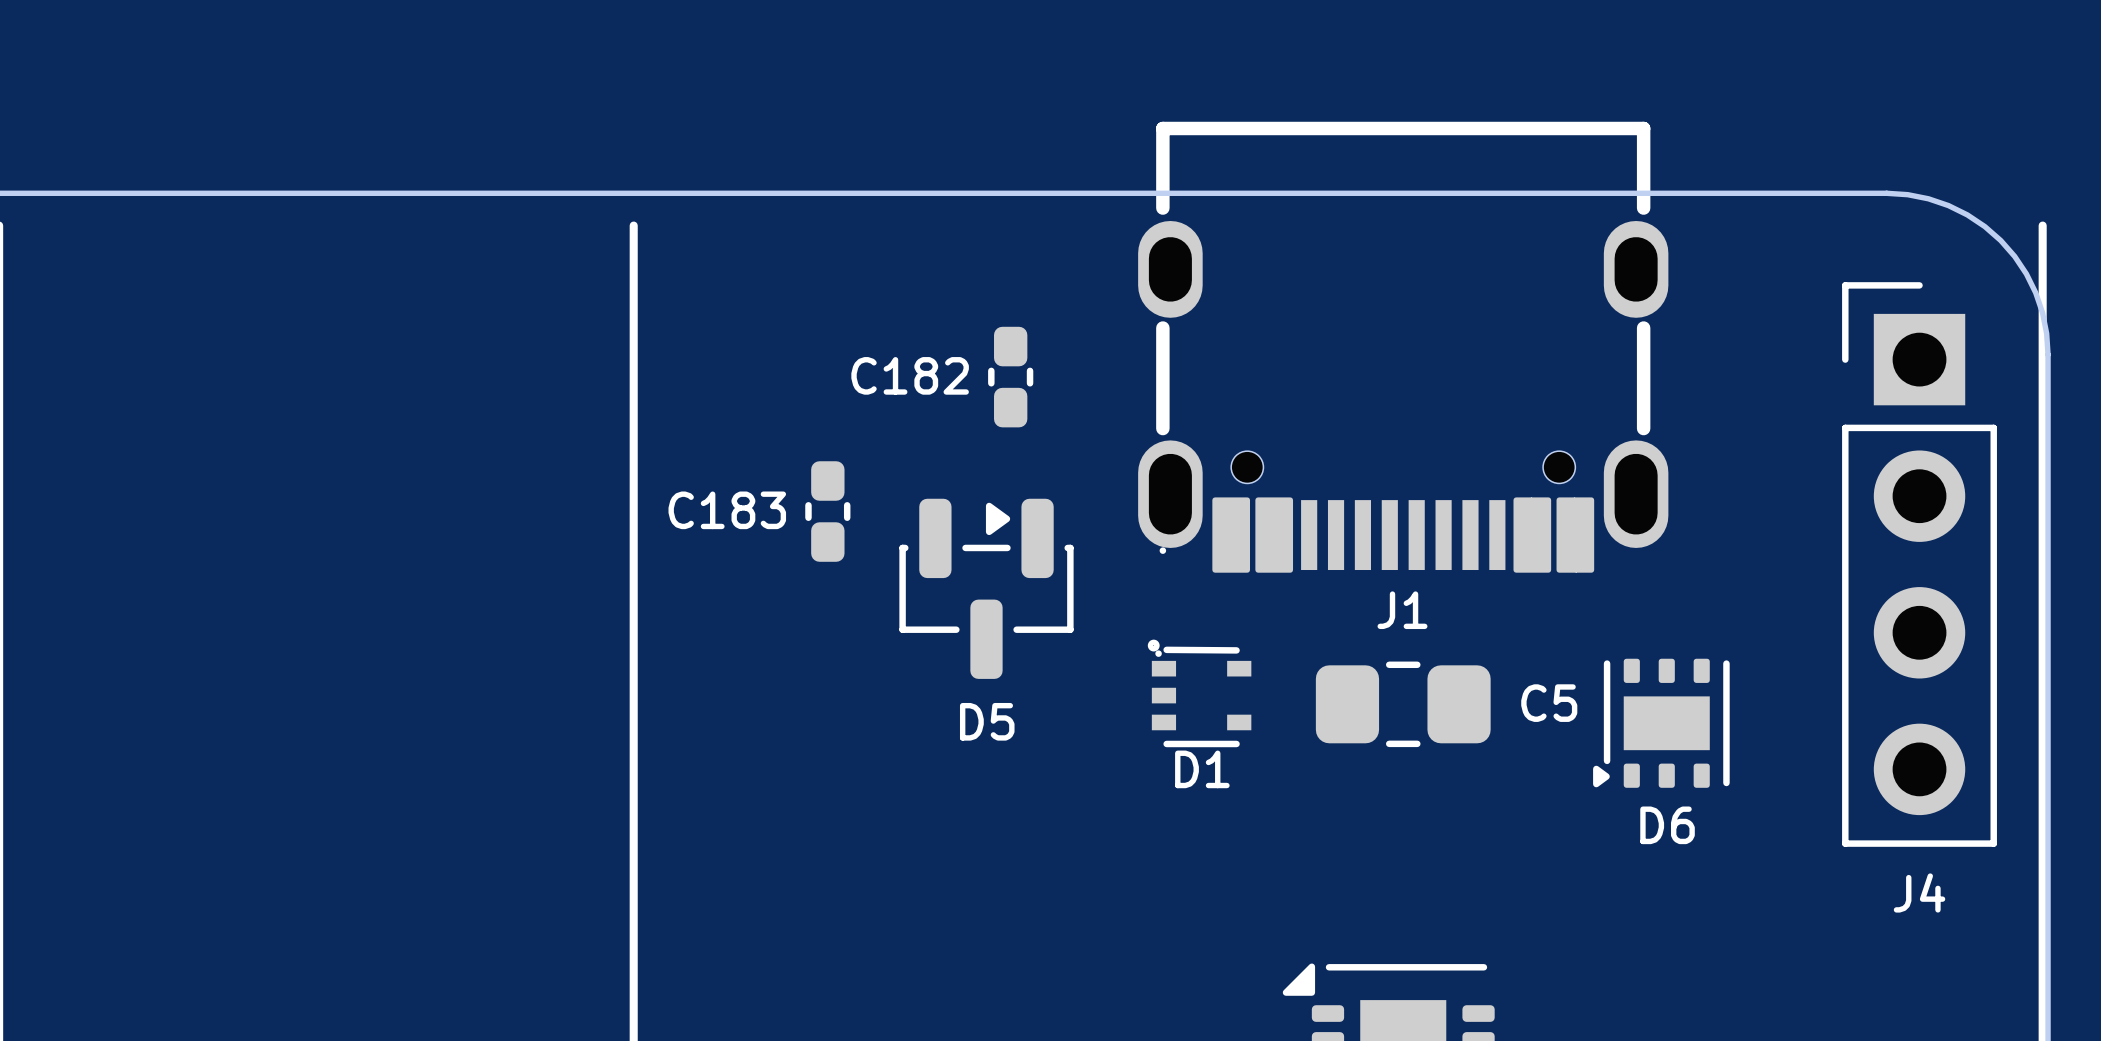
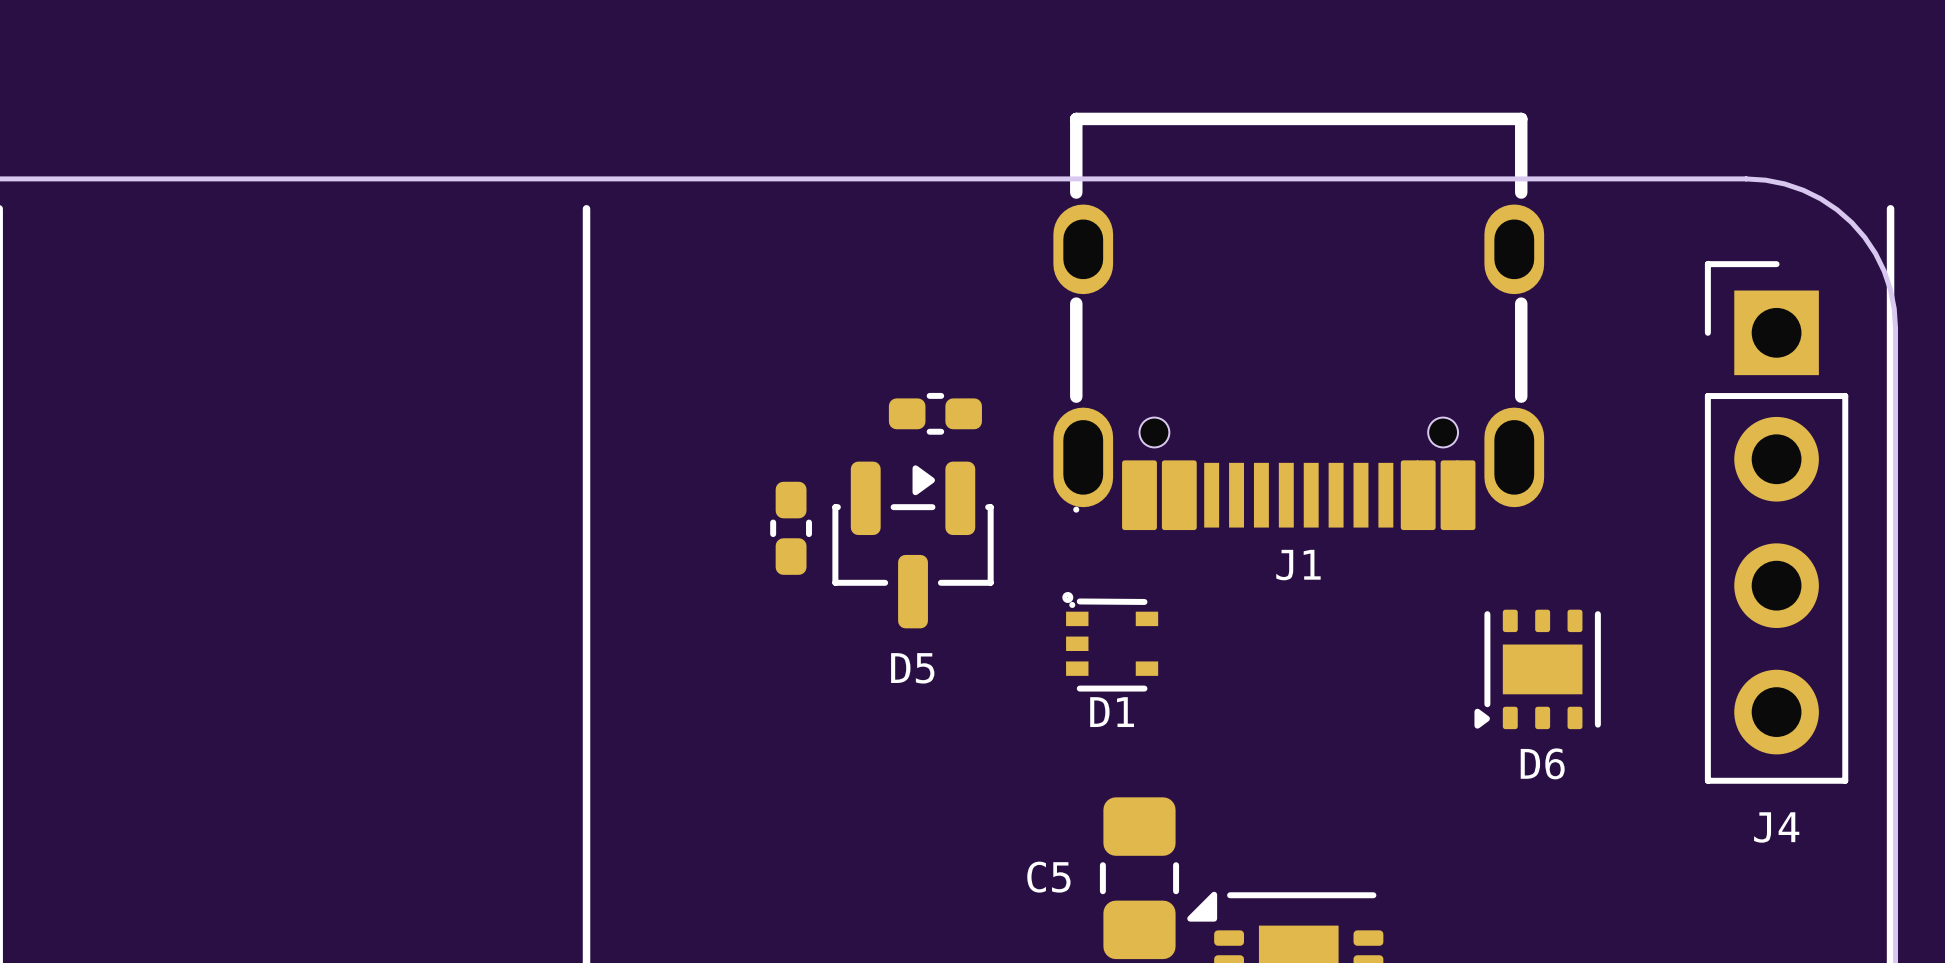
C182: (1010, 377) -> none
part: none -> (935, 413)
C183: (827, 511) -> none
part: none -> (791, 528)
C5 name position: C5 (1549, 703) -> C5 (1048, 877)
C5 rotation: 0° (1403, 704) -> 90° clockwise (1139, 878)
C5 position: (1403, 704) -> (1139, 878)

